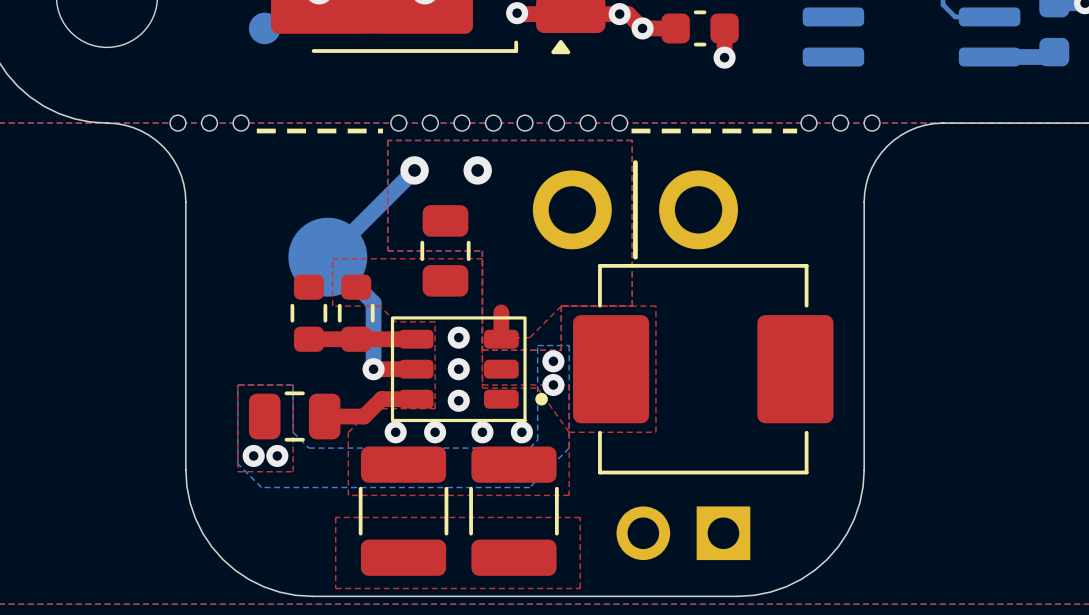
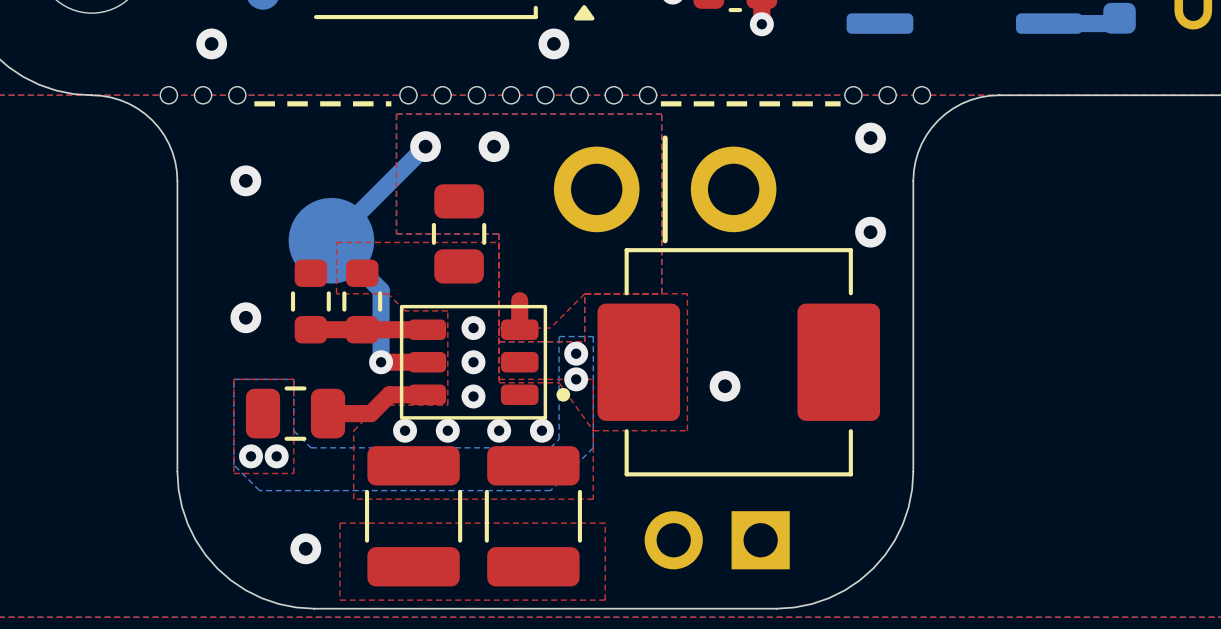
via: none -> (211, 43)
via: none -> (553, 43)
via: none -> (870, 138)
via: none -> (245, 180)
via: none -> (870, 232)
via: none -> (245, 317)
via: none -> (725, 386)
via: none -> (305, 548)

